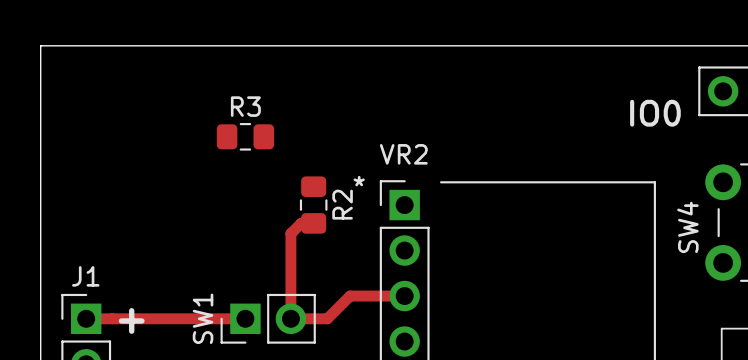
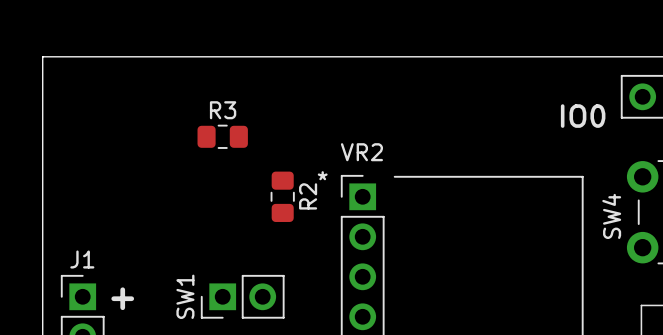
track: (313, 223) (301, 223) (290, 233) (290, 318) (327, 318) (350, 296) (404, 296) -> none
track: (86, 318) (245, 318) -> none

